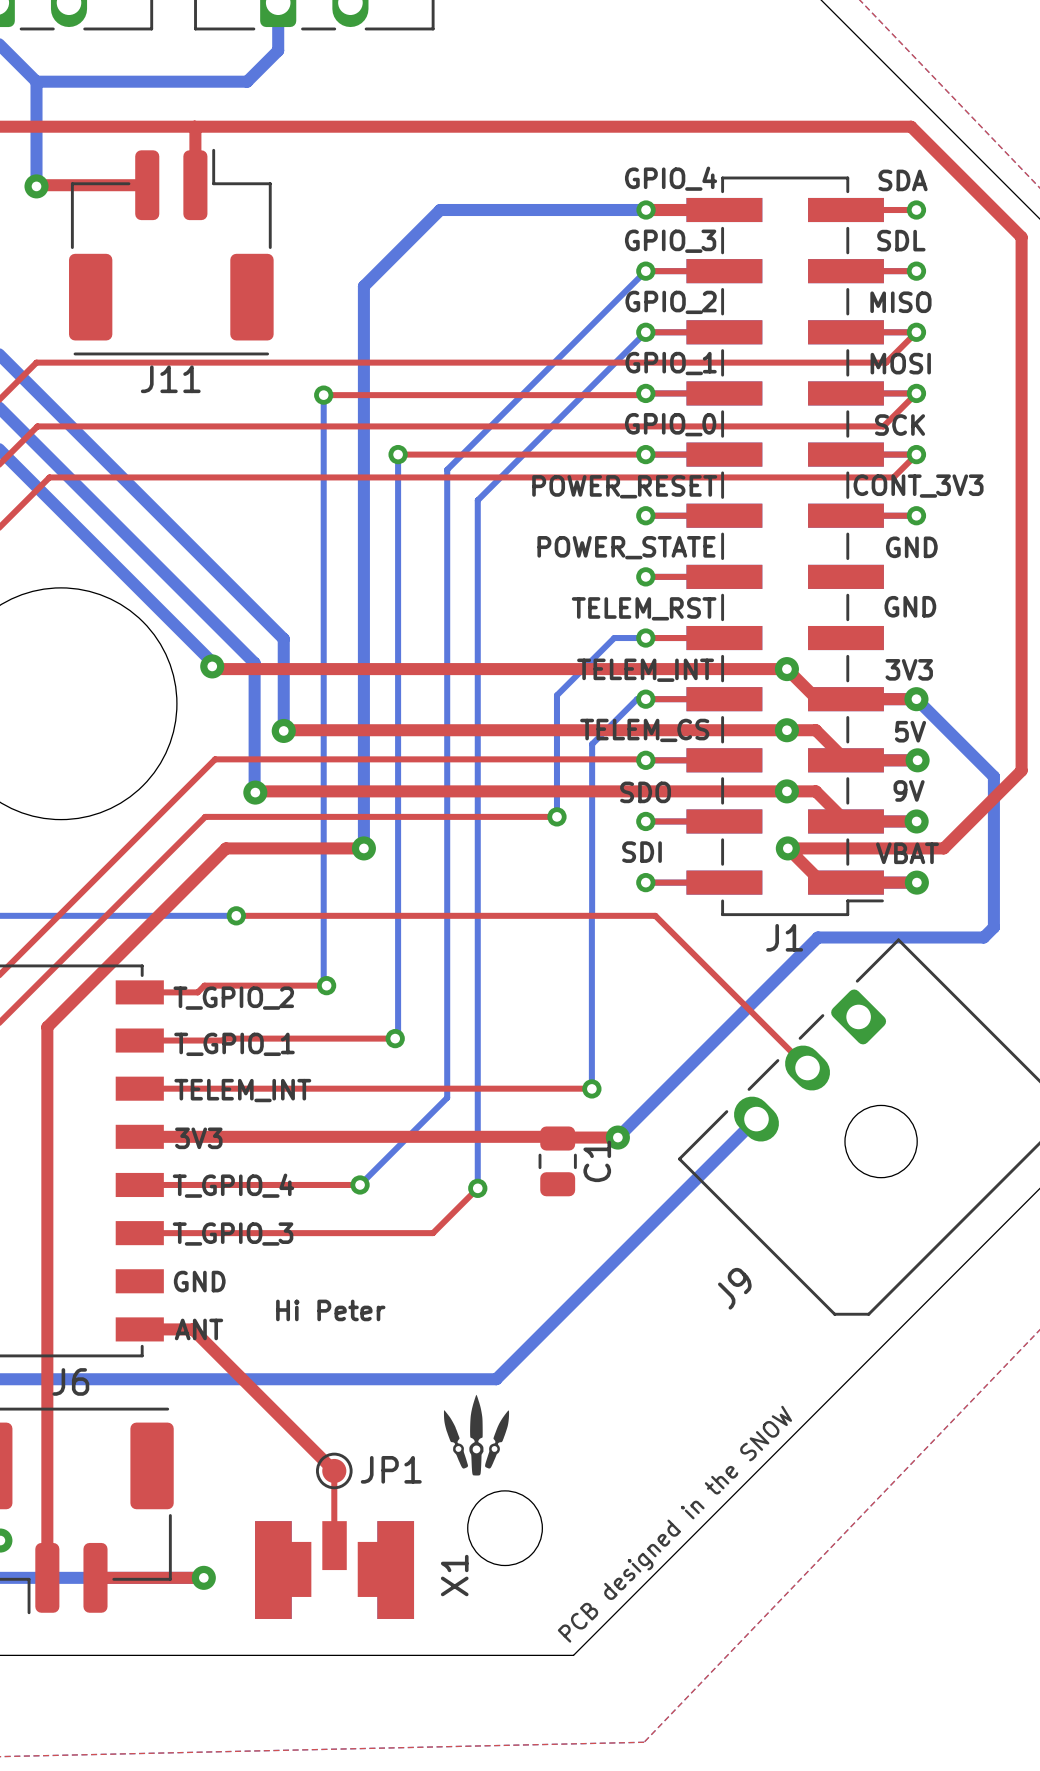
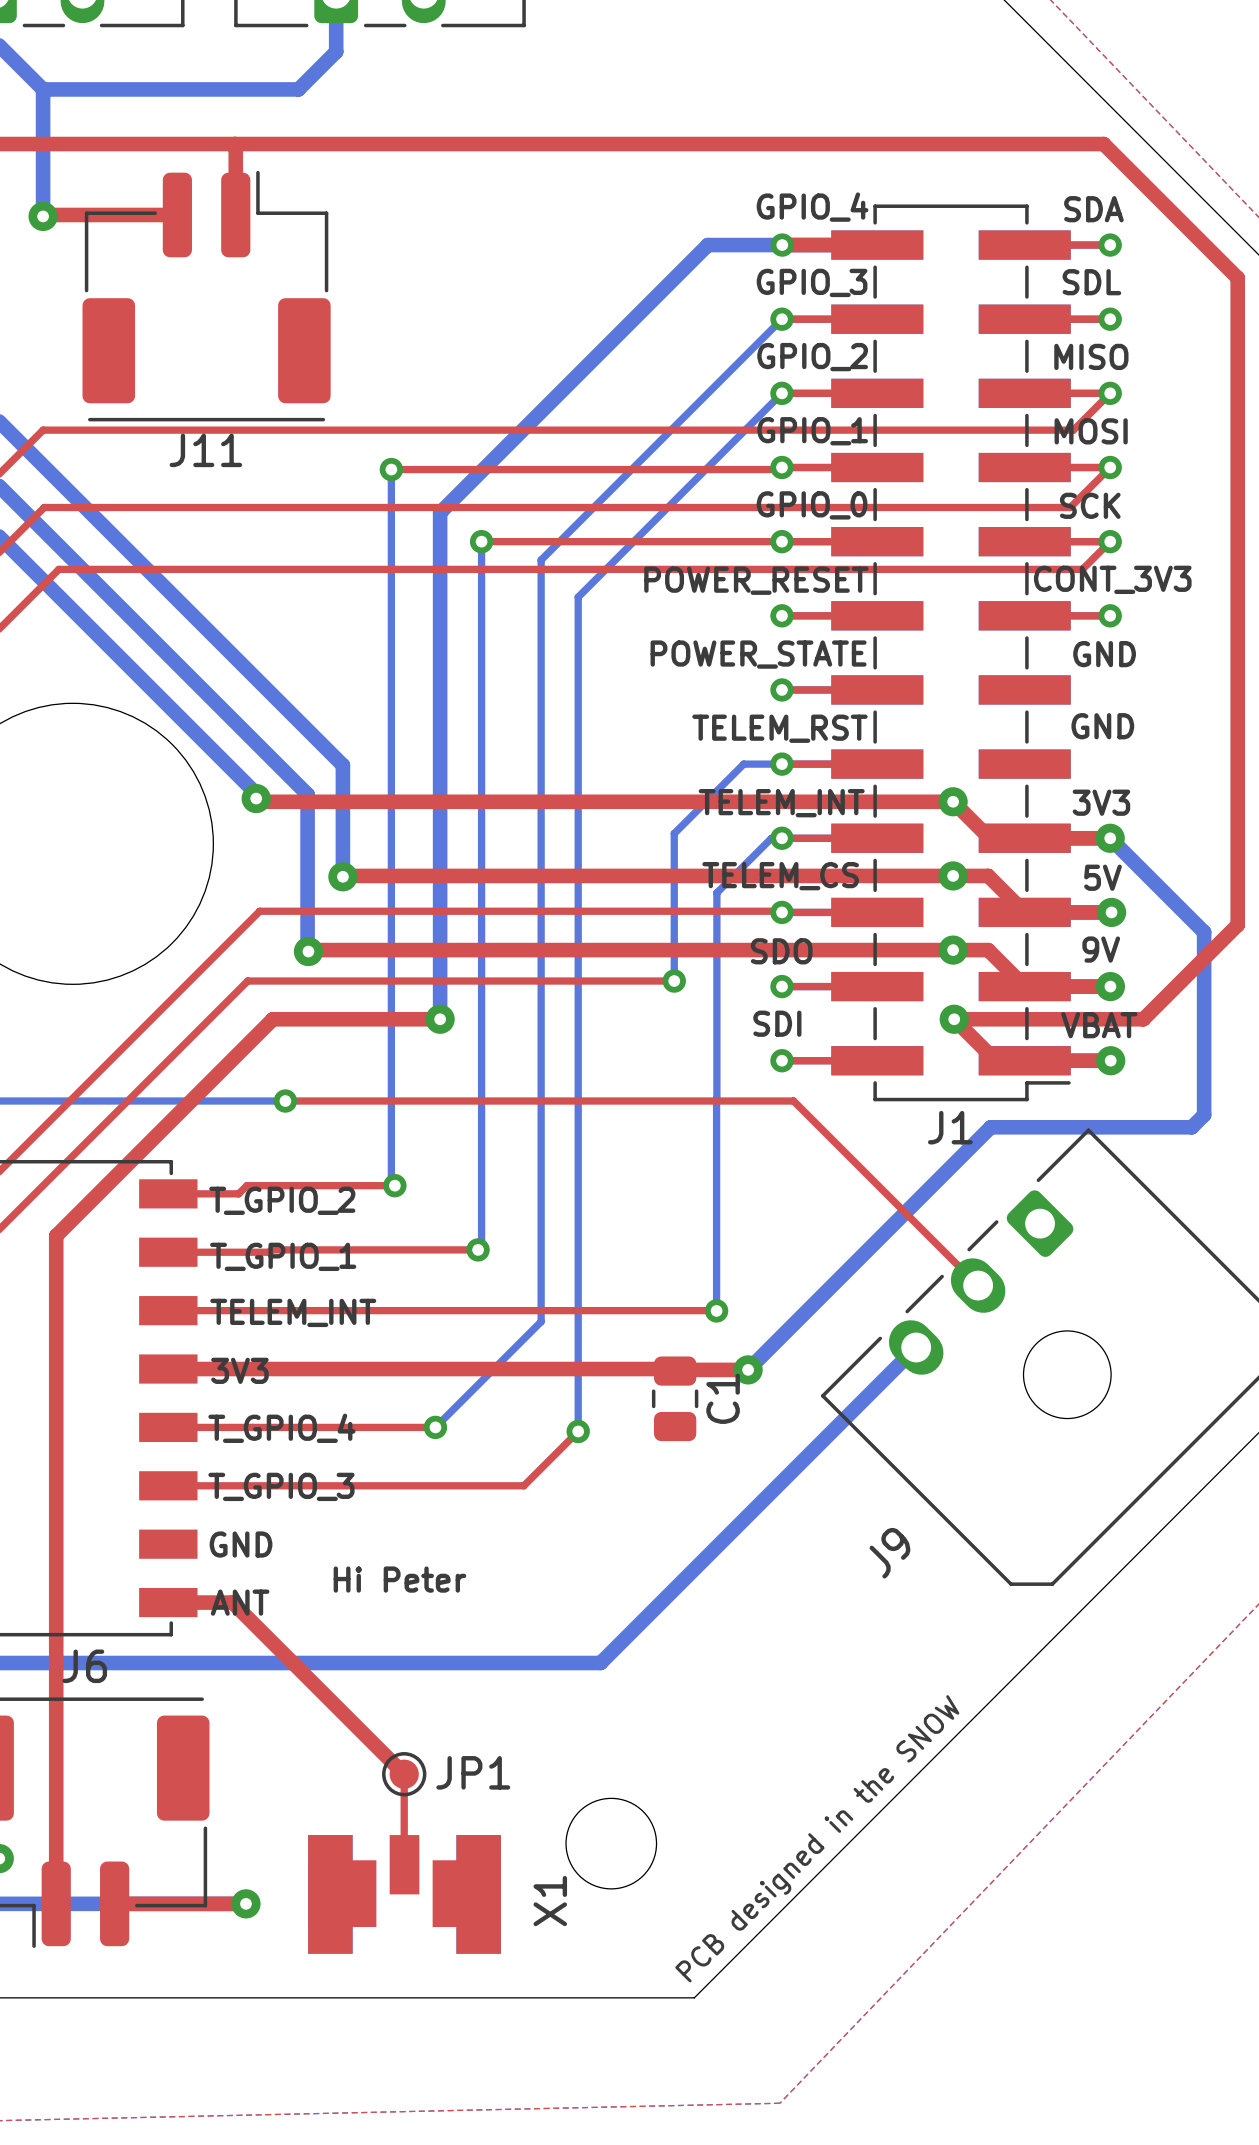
bottom track: (584, 210) (440, 210) (363, 286) (363, 430) -> (707, 245) (440, 512)
drawing: [443, 1394, 510, 1476] -> none

